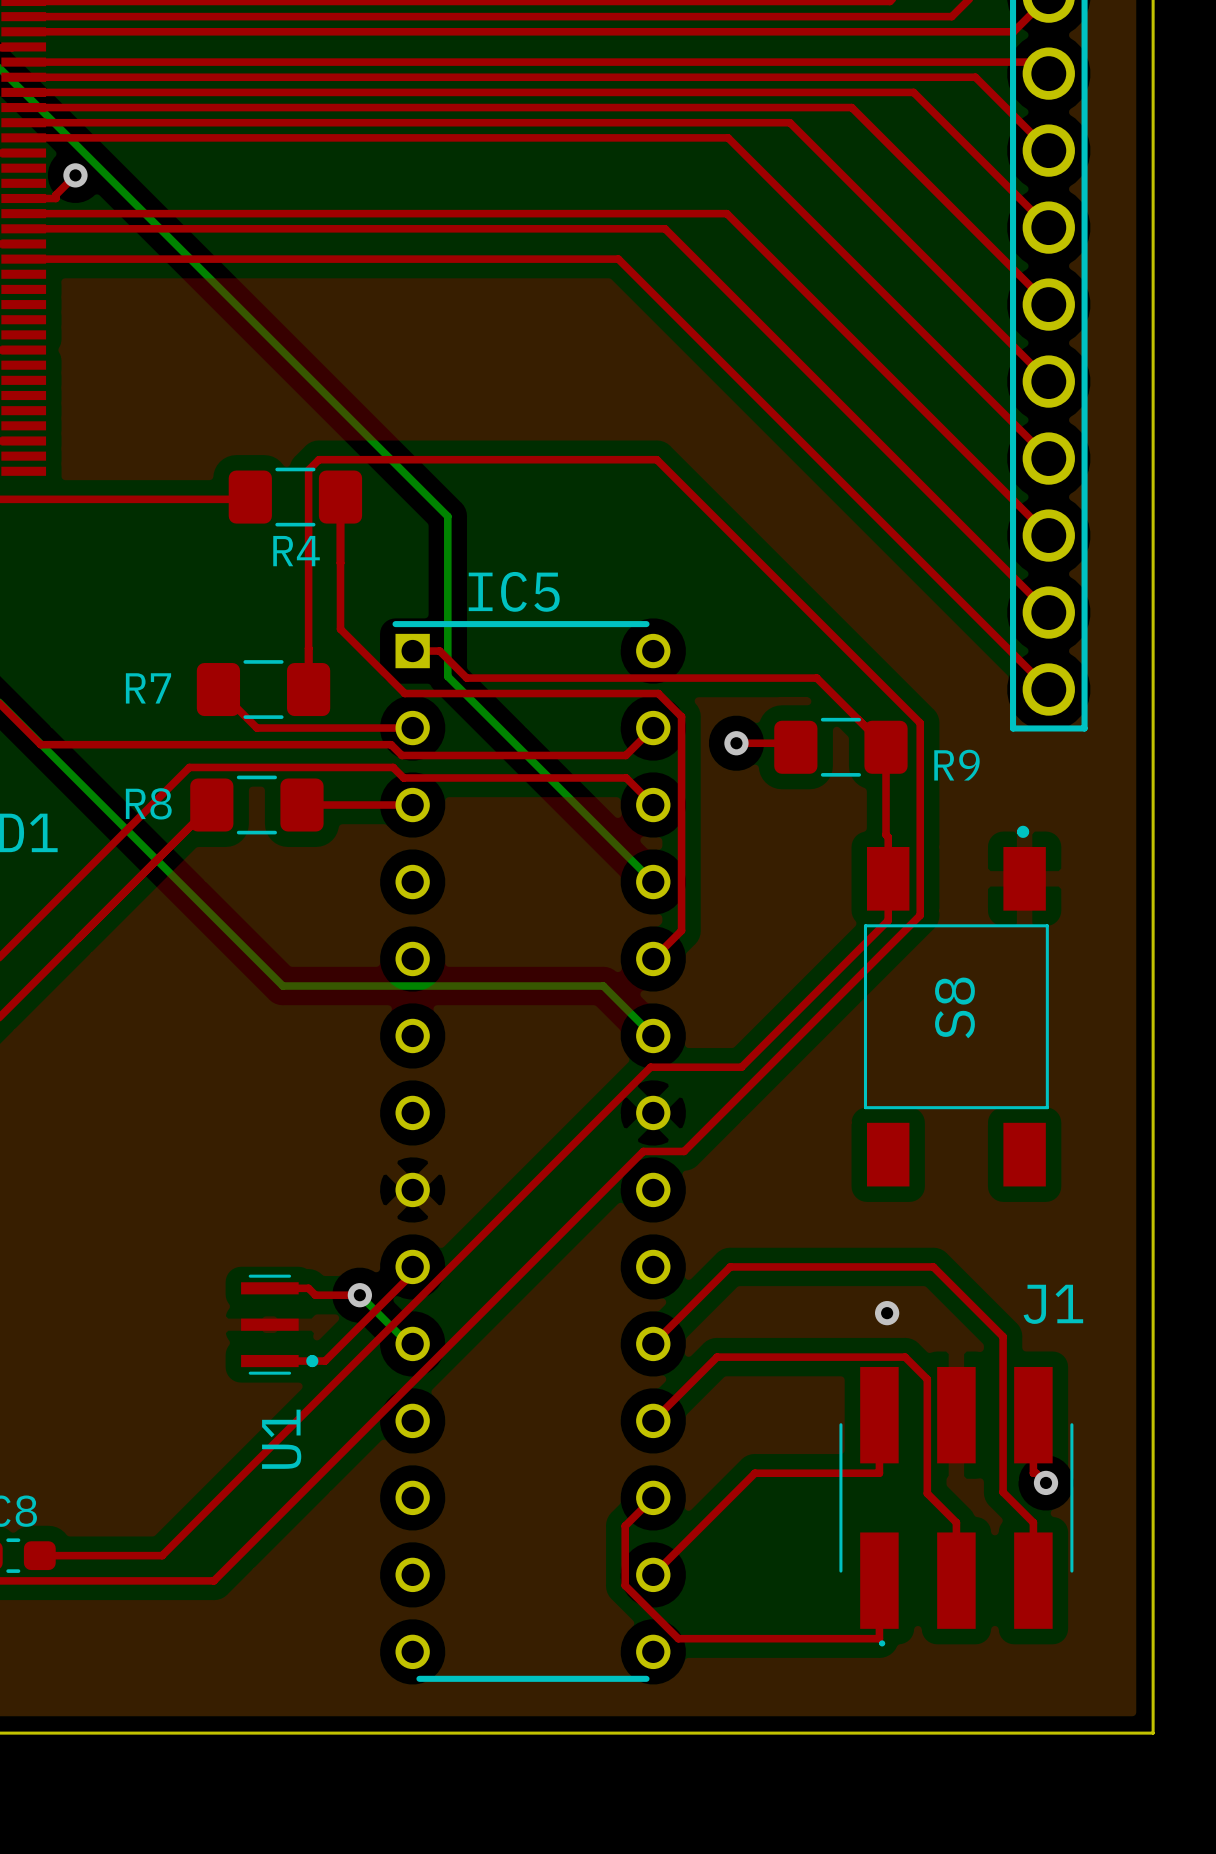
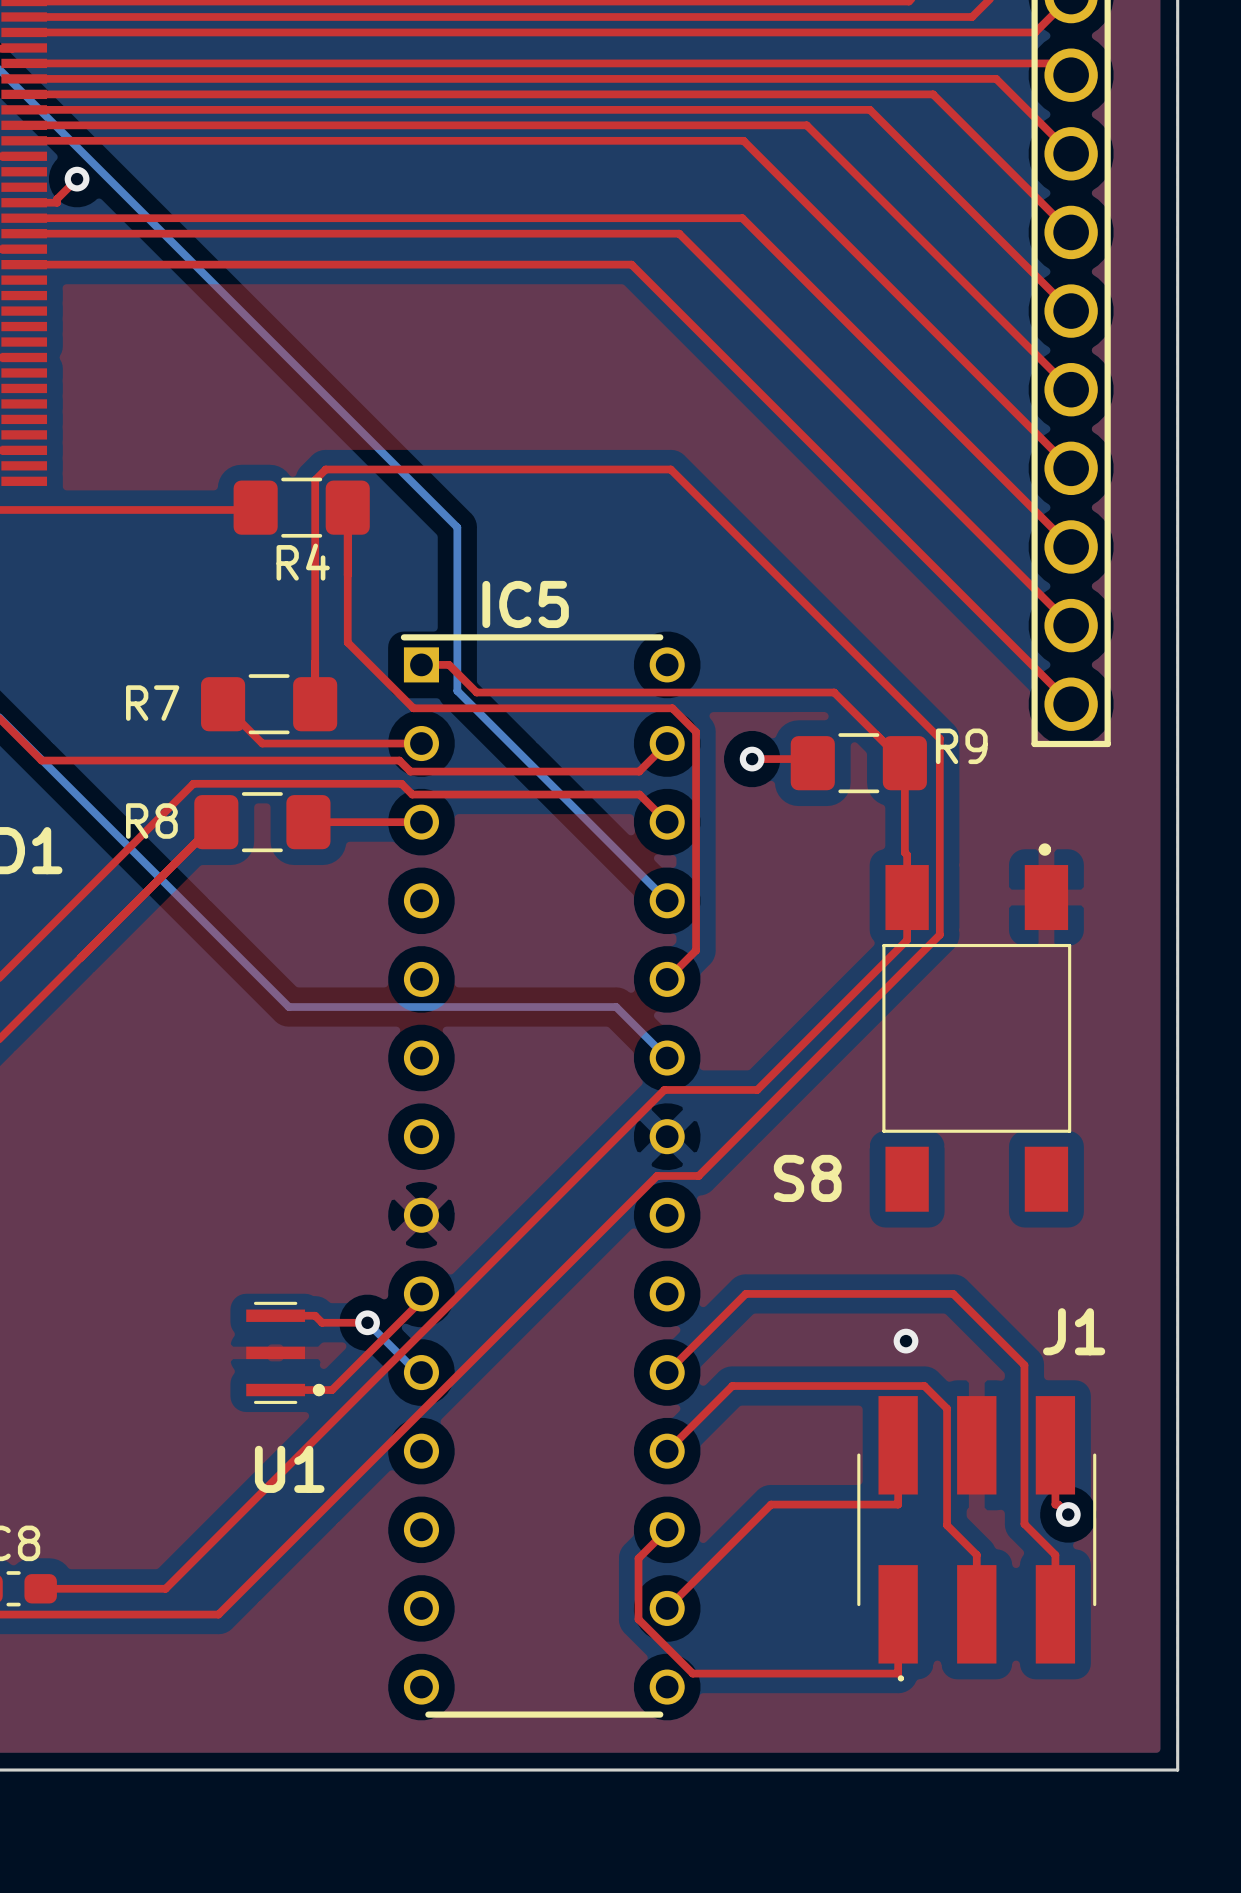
R9 name position: R9 (956, 765) -> R9 (961, 746)
S8 name rotation: 0° (954, 1007) -> 90° clockwise (807, 1178)
S8 name position: S8 (954, 1007) -> S8 (807, 1178)
U1 name rotation: 0° (281, 1439) -> 90° clockwise (289, 1469)

